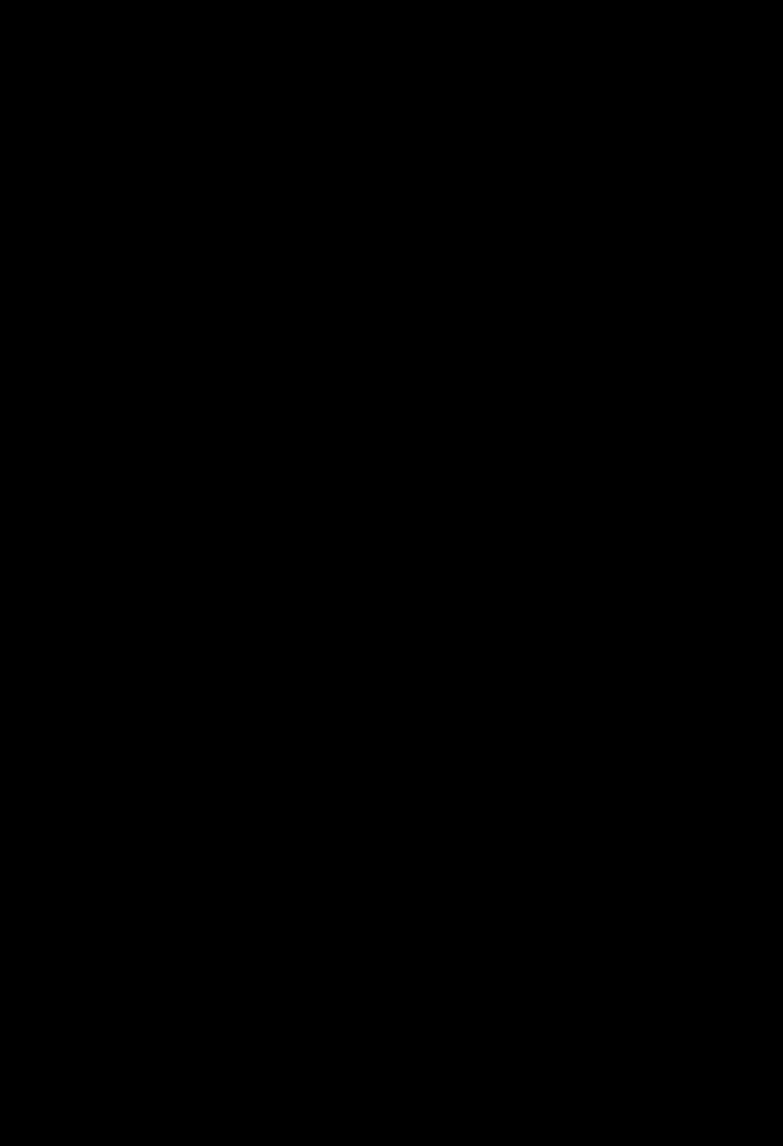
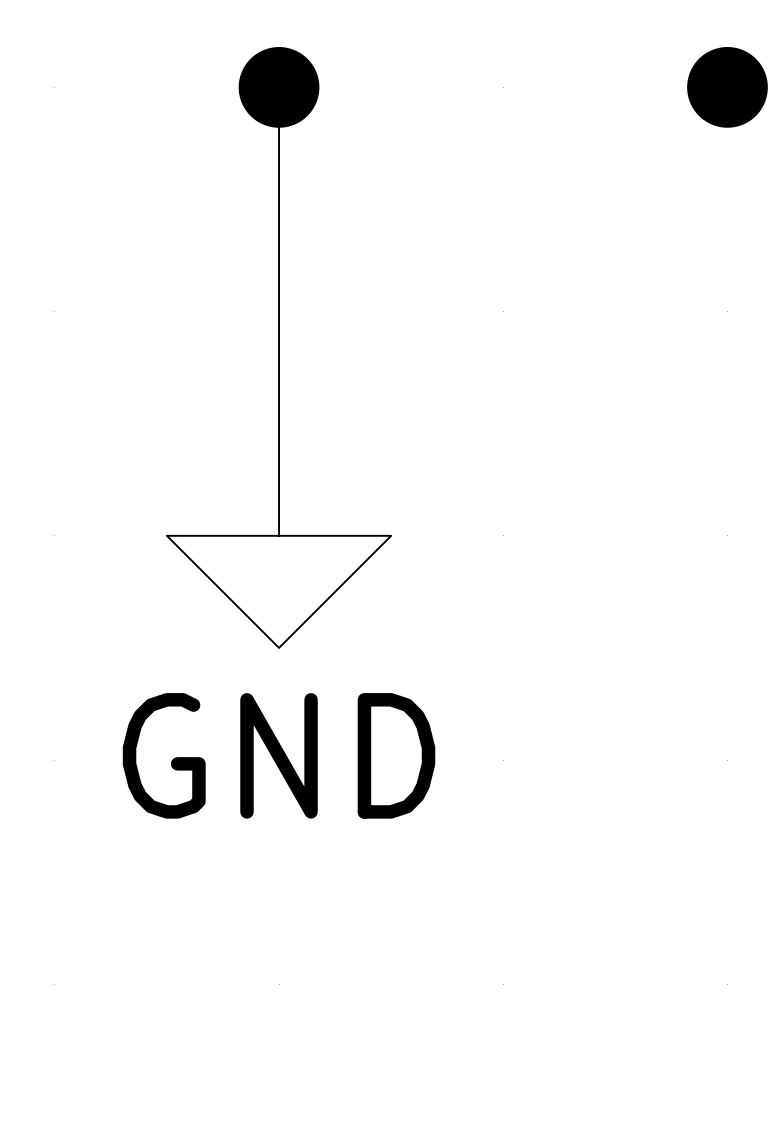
wire: none -> (279, 87) (279, 423)
junction: none -> (279, 87)
junction: none -> (727, 87)
power symbol: none -> GND (279, 535)

